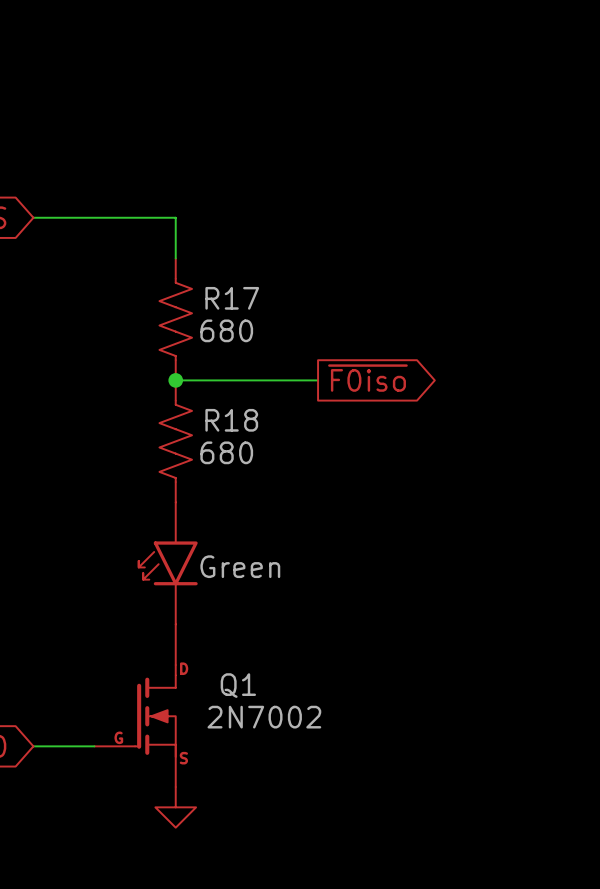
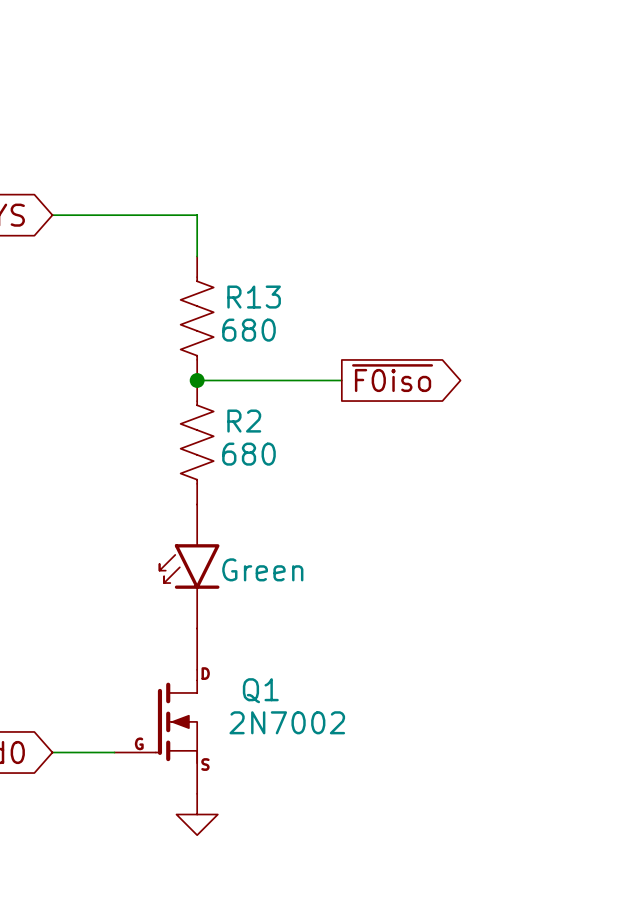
R17 name: R17 (232, 298) -> R13 (254, 297)
R18 name: R18 (231, 420) -> R2 (244, 421)

